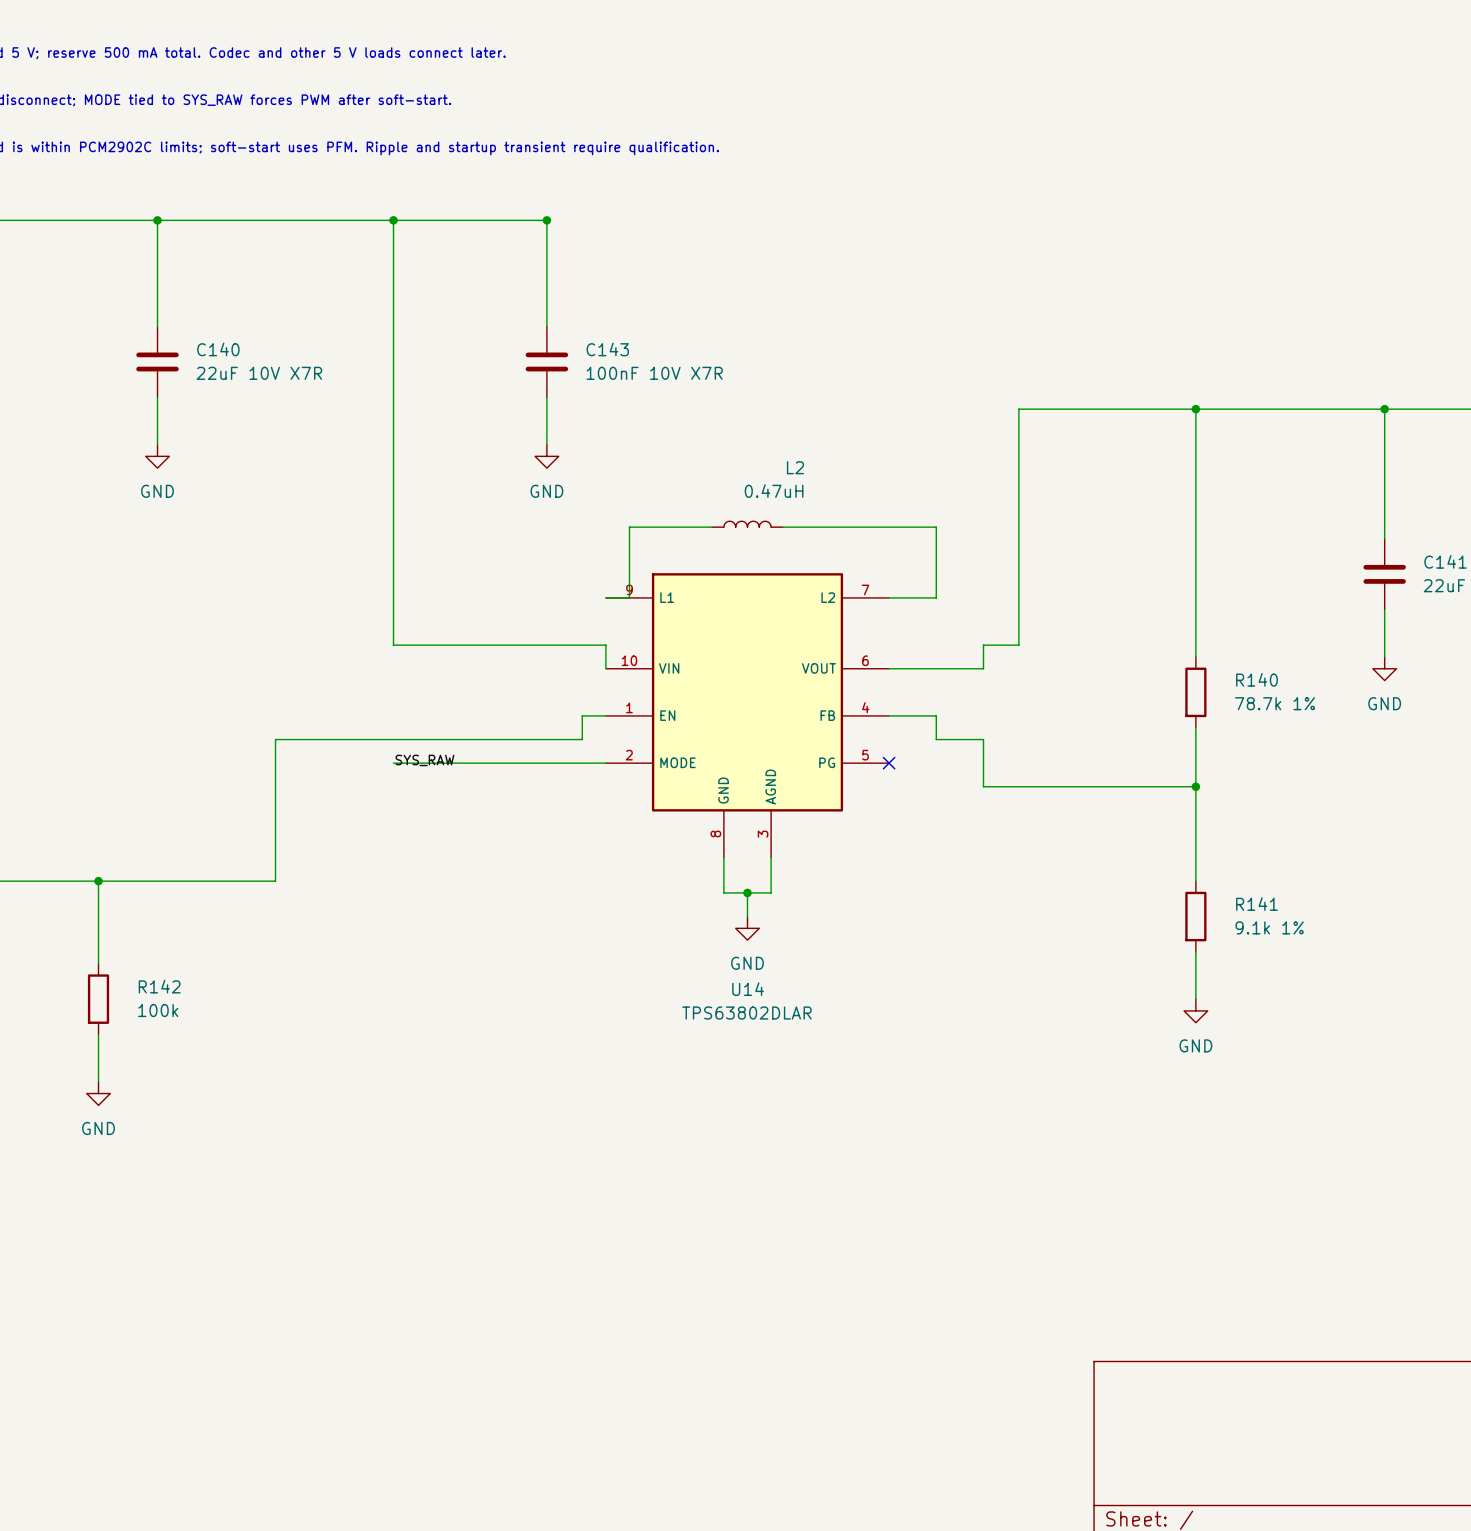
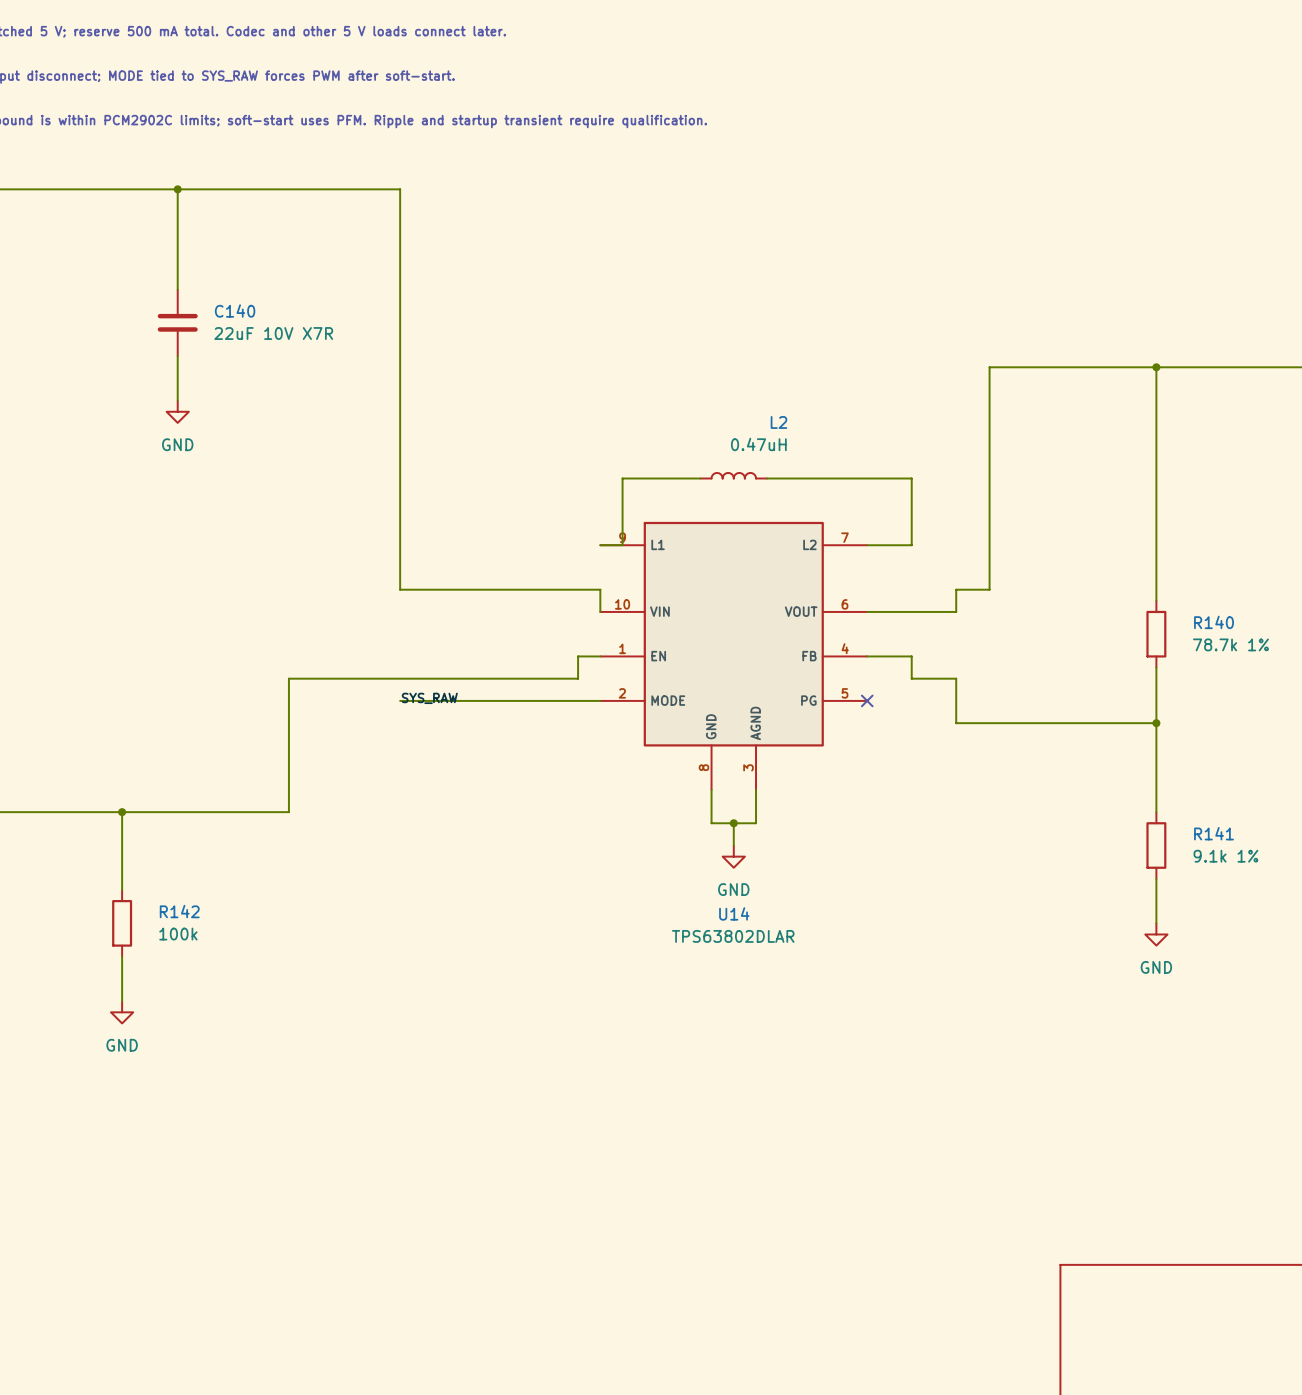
wire: (393, 220) (546, 220) (546, 326) -> none
junction: (393, 220) -> none
junction: (546, 220) -> none
C143: 100nF 10V X7R (546, 361) -> none
wire: (546, 397) (546, 444) -> none
power symbol: GND (546, 456) -> none

